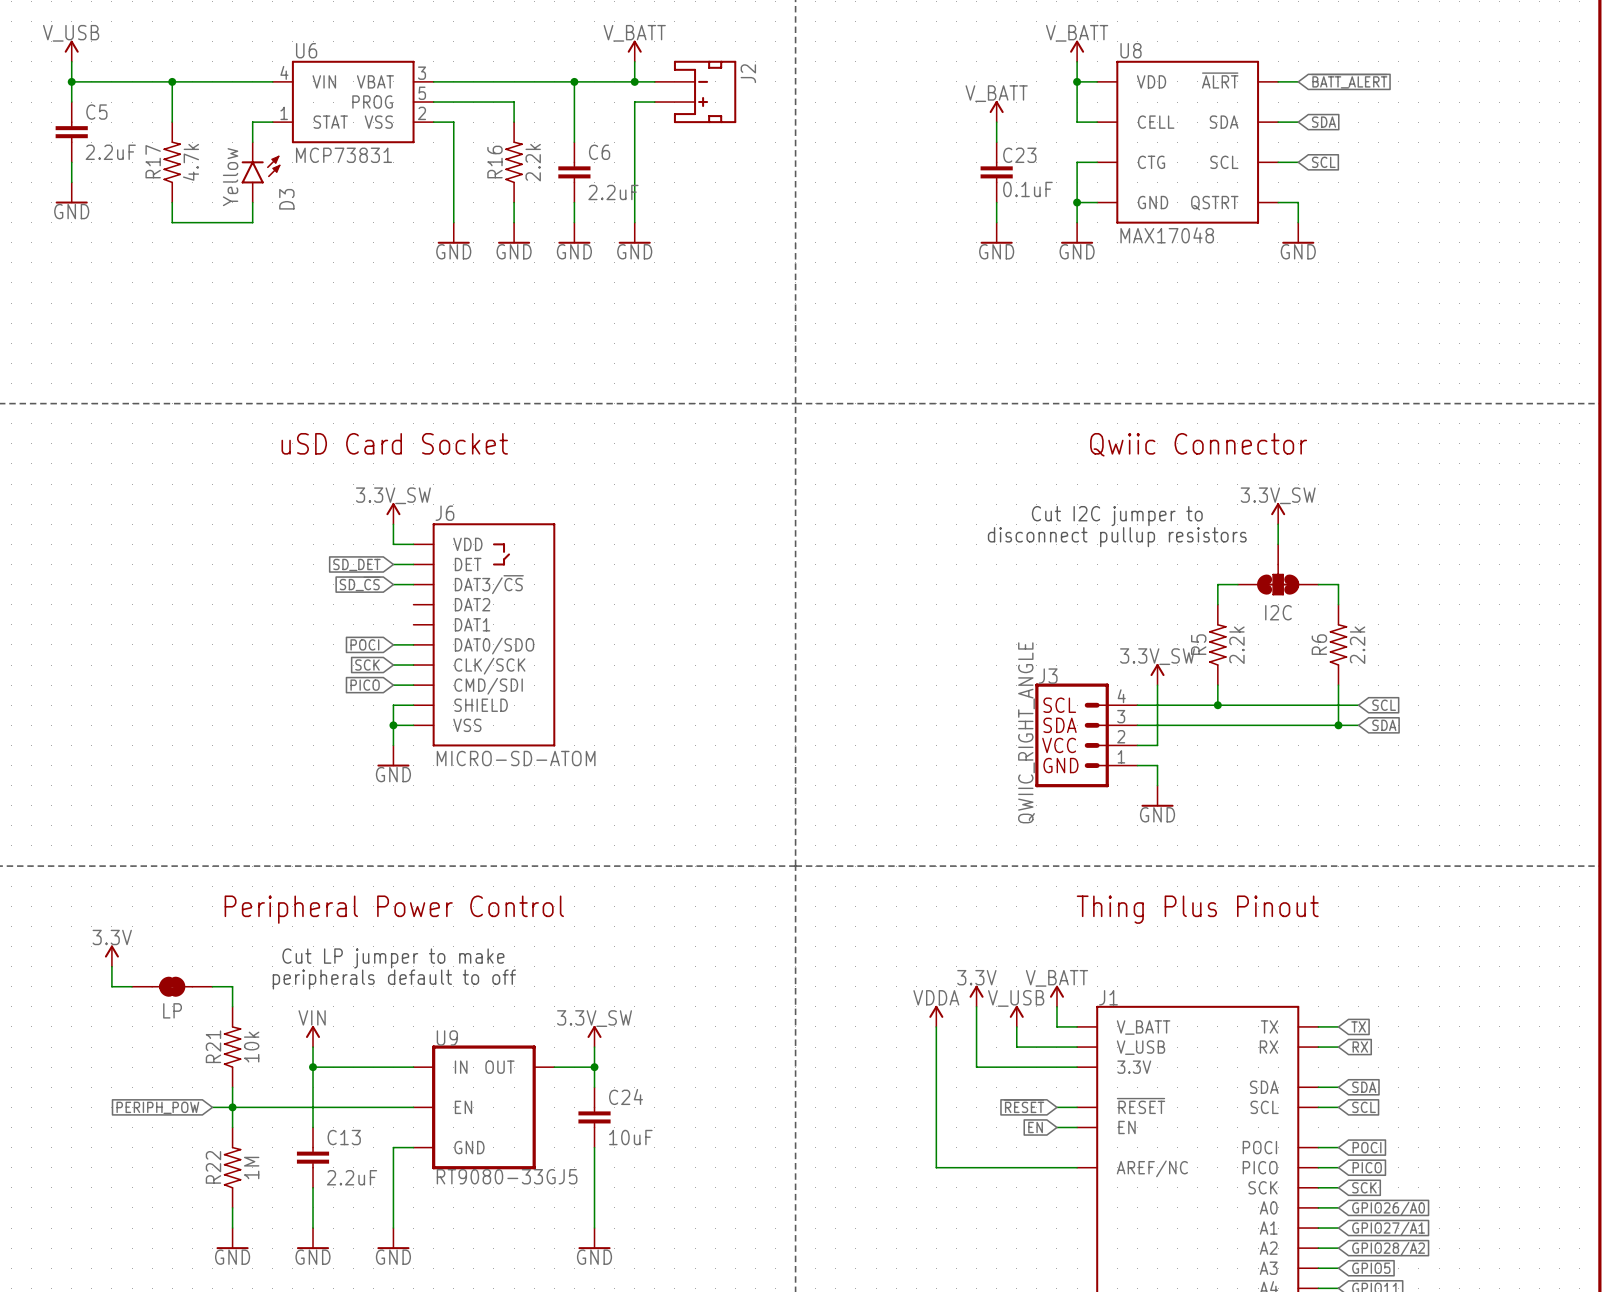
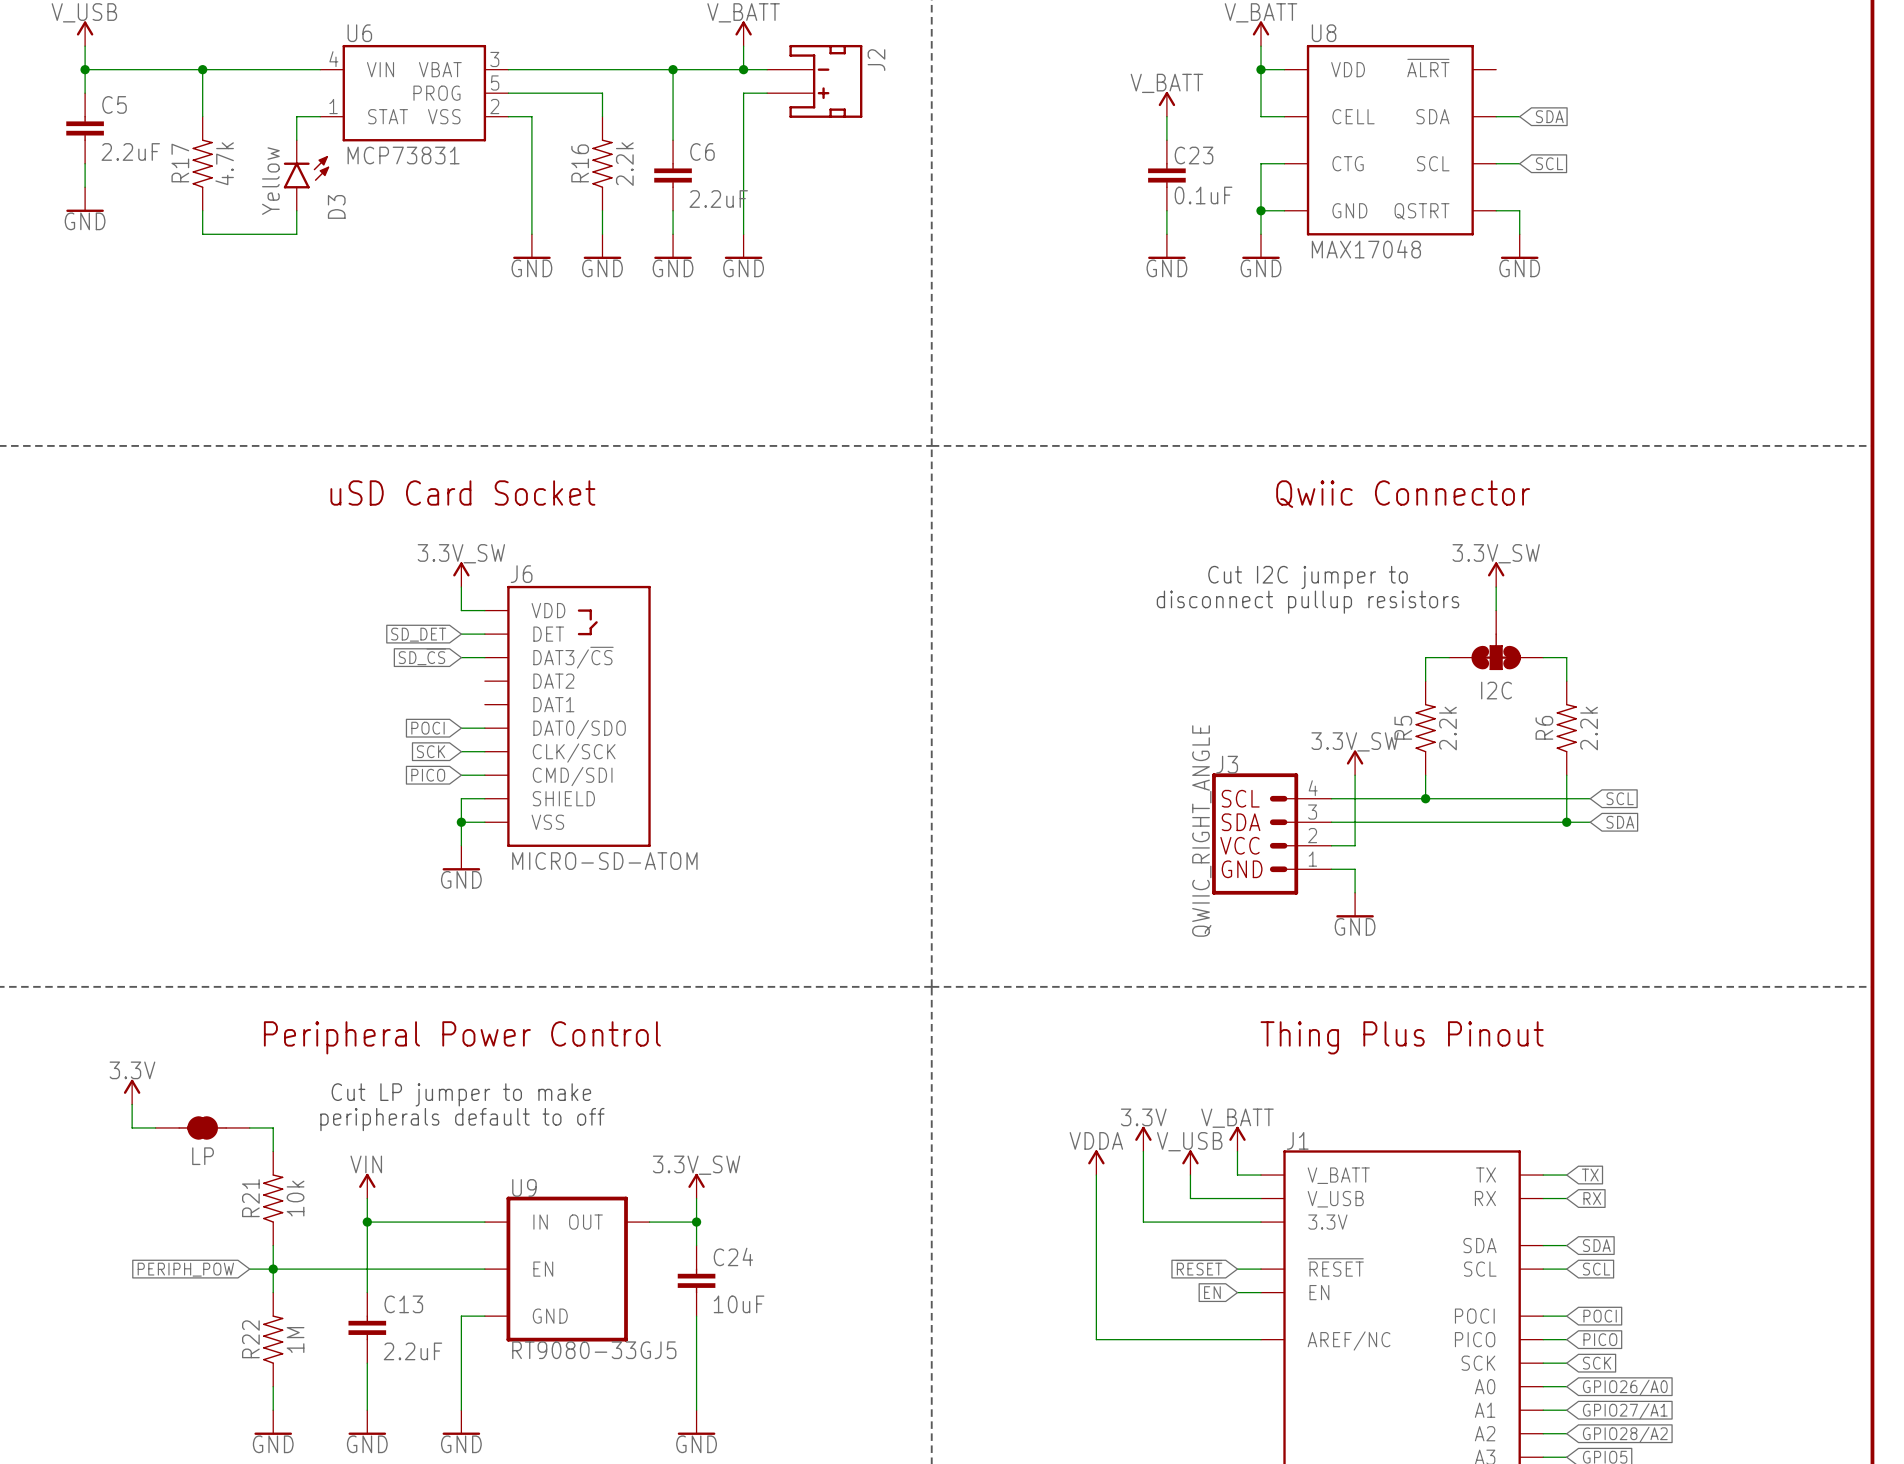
wire: (1278, 81) (1298, 81) -> none
global label: ~{BATT_ALERT} (1349, 81) -> none

